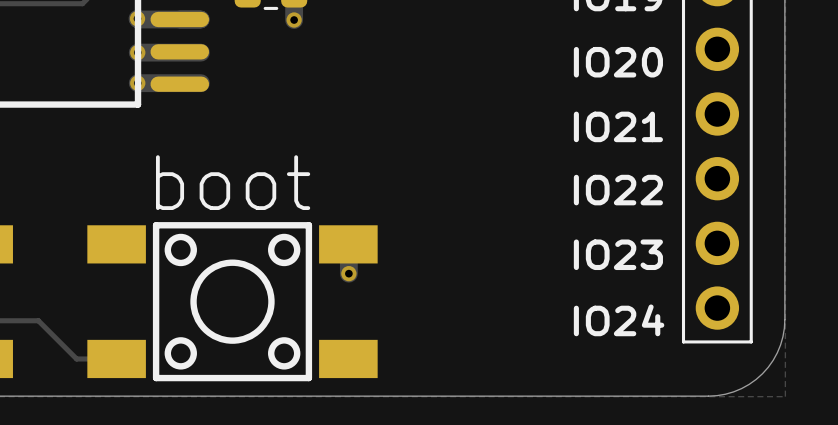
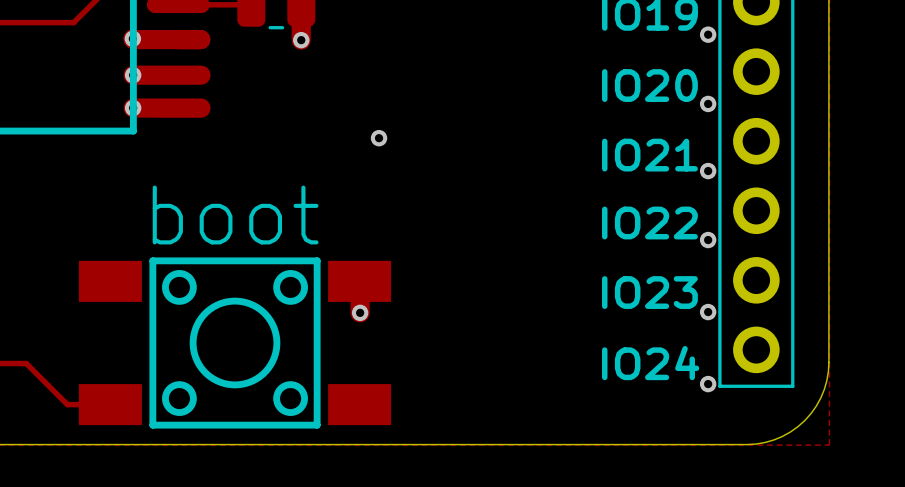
via: none -> (708, 34)
via: none -> (708, 103)
via: none -> (379, 138)
via: none -> (708, 171)
via: none -> (708, 240)
via: none -> (708, 312)
via: none -> (708, 384)

